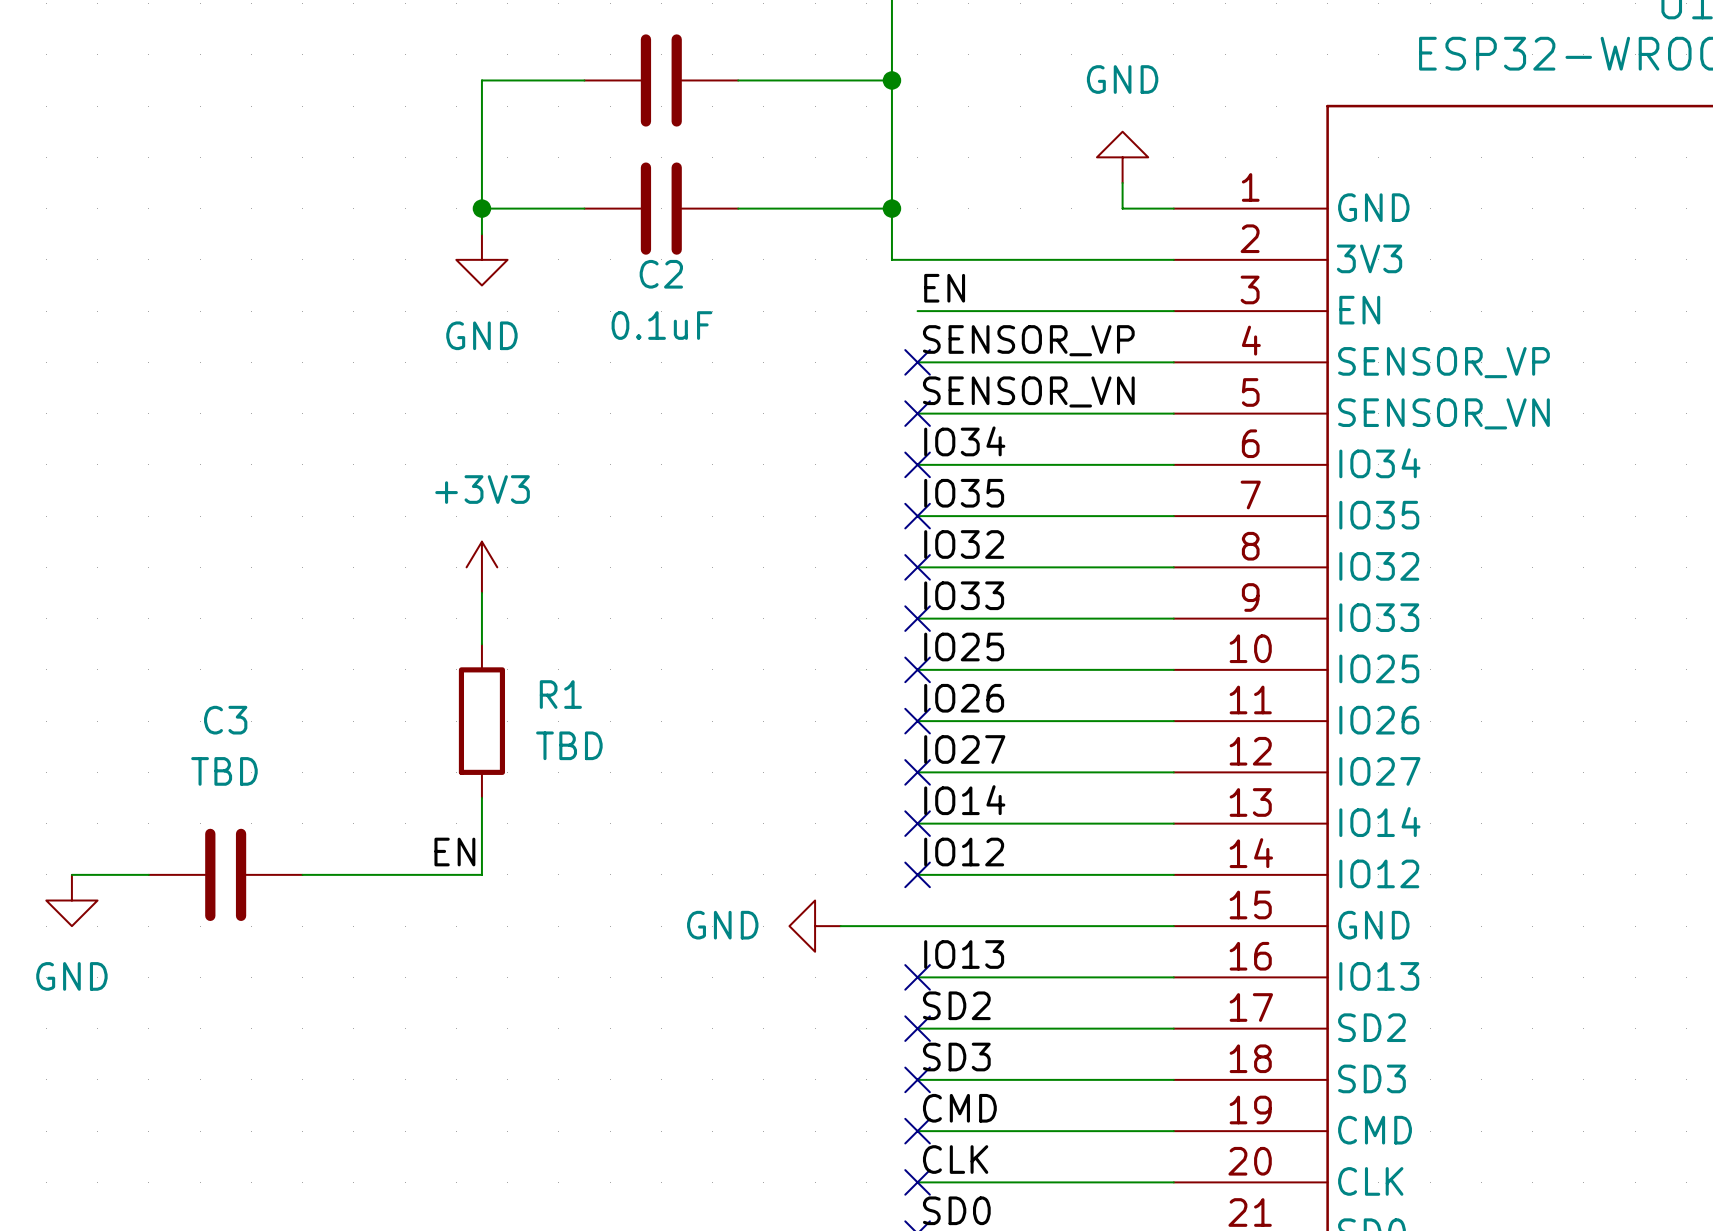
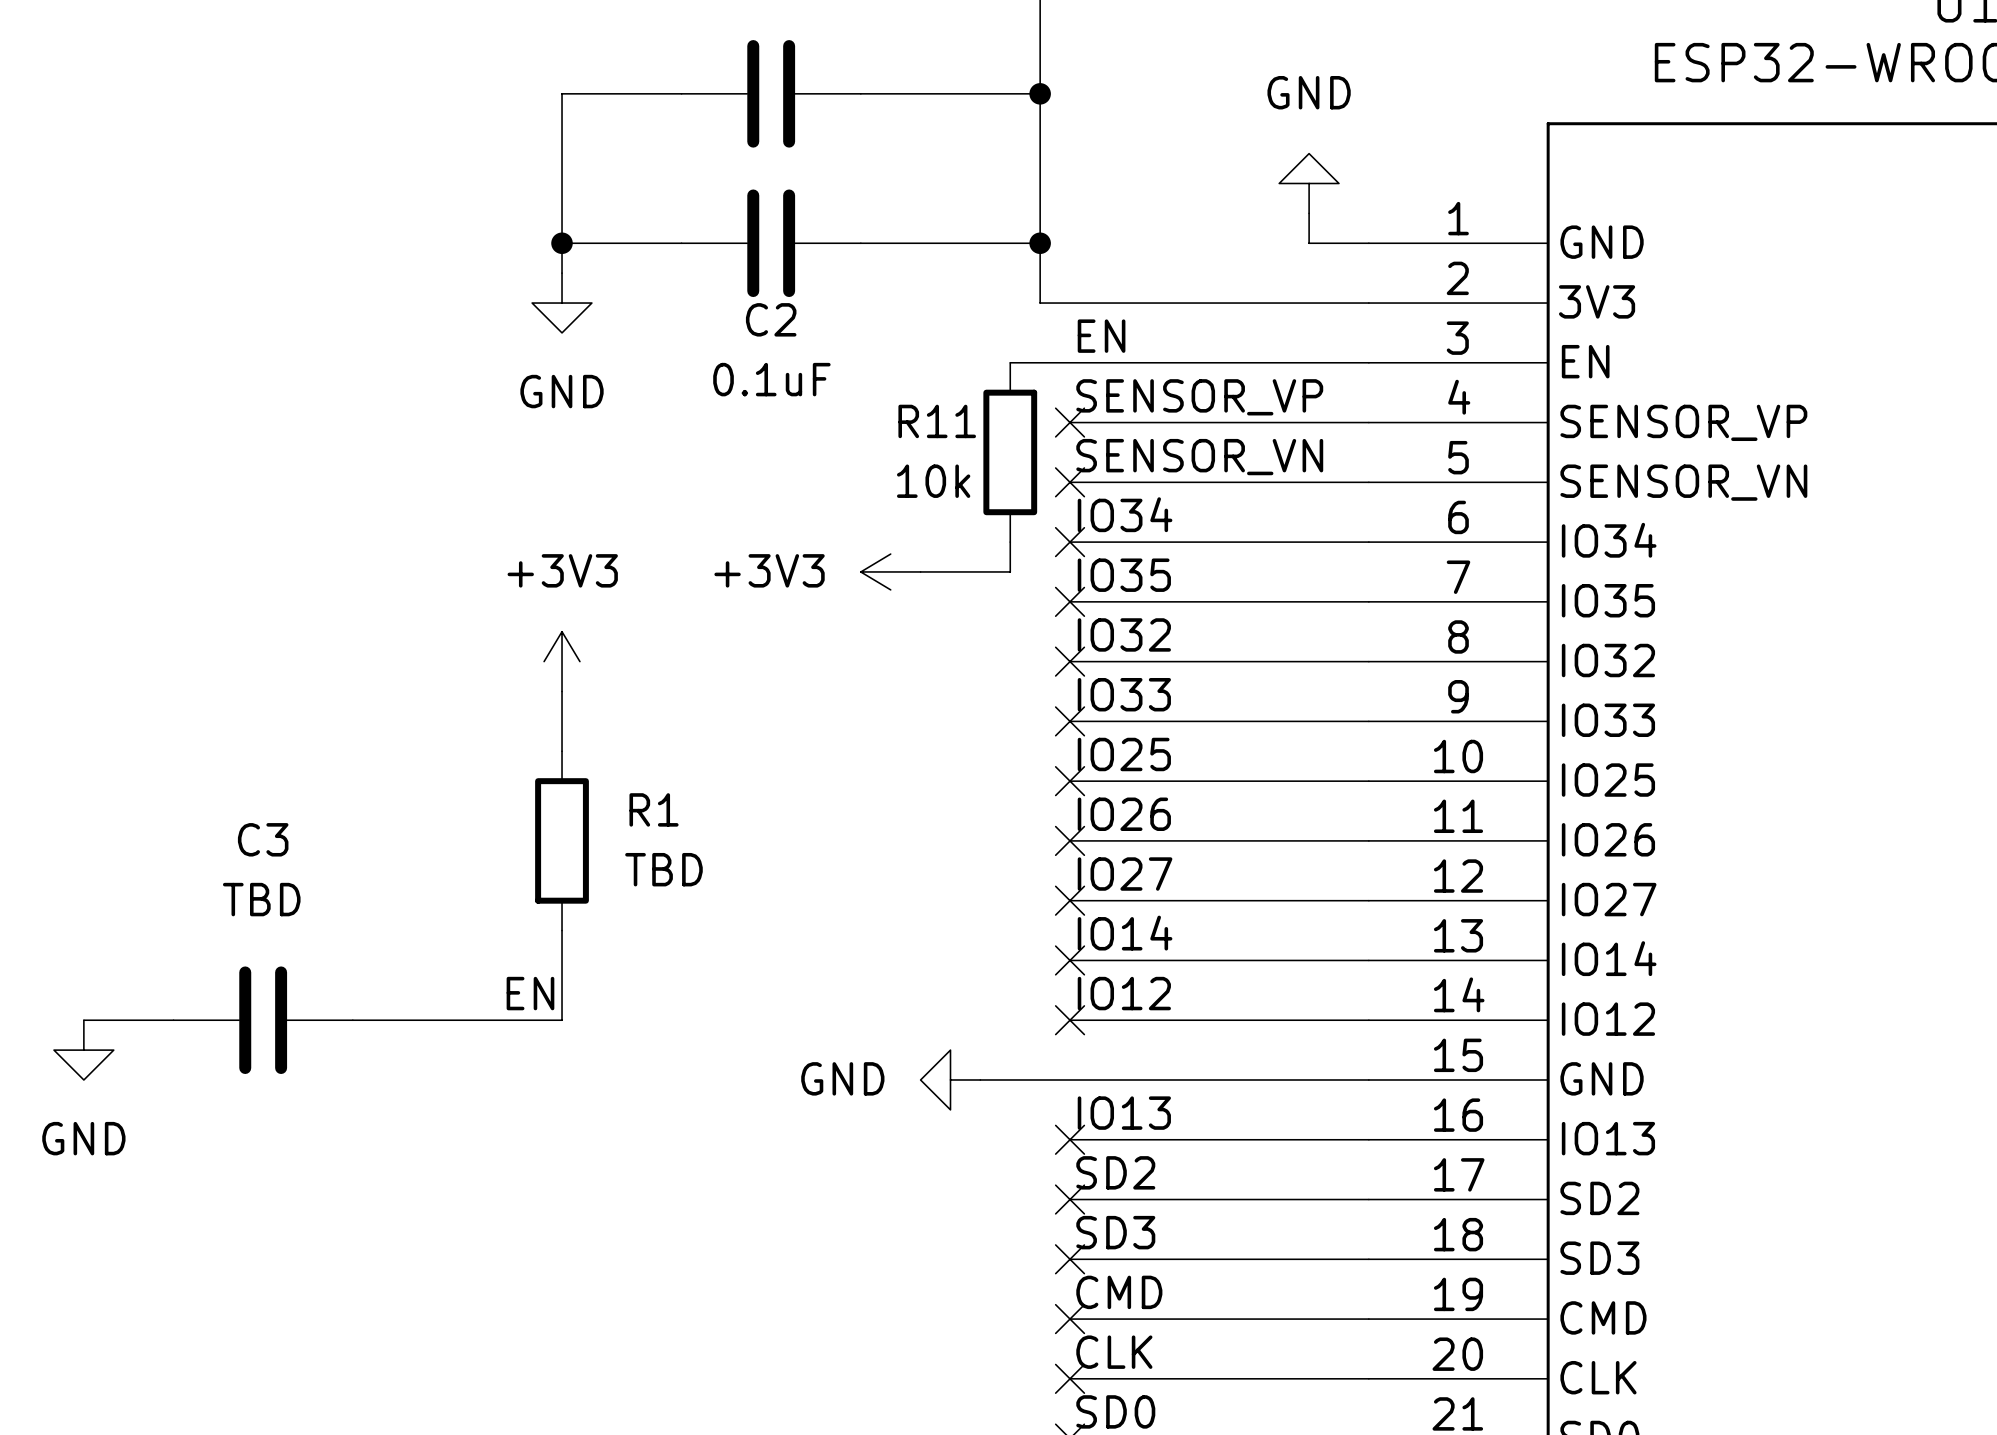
wire: none -> (1010, 362) (1070, 362)
R11: none -> 10k (1010, 452)
wire: none -> (1010, 542) (1010, 571) (920, 571)
power symbol: none -> +3V3 (890, 571)

